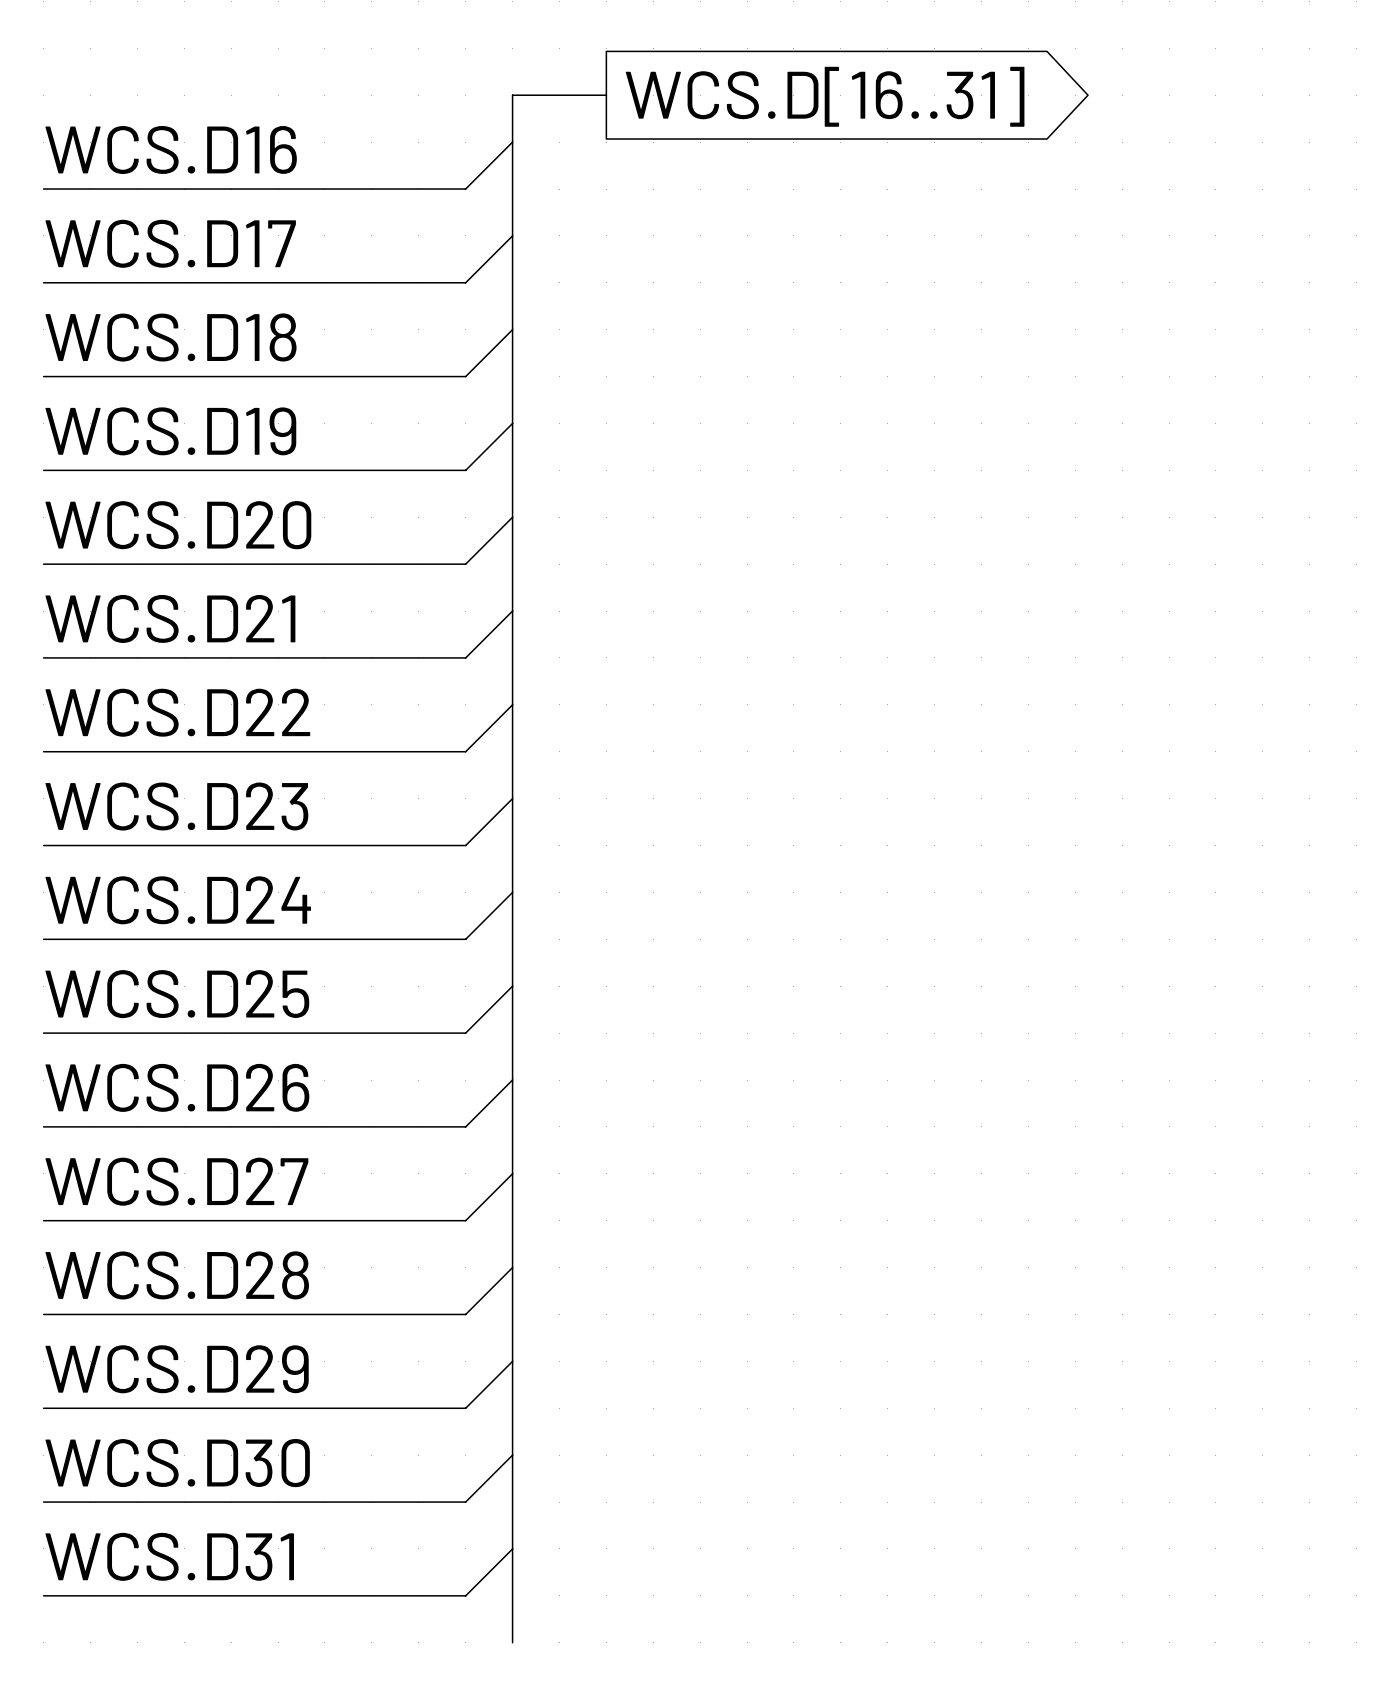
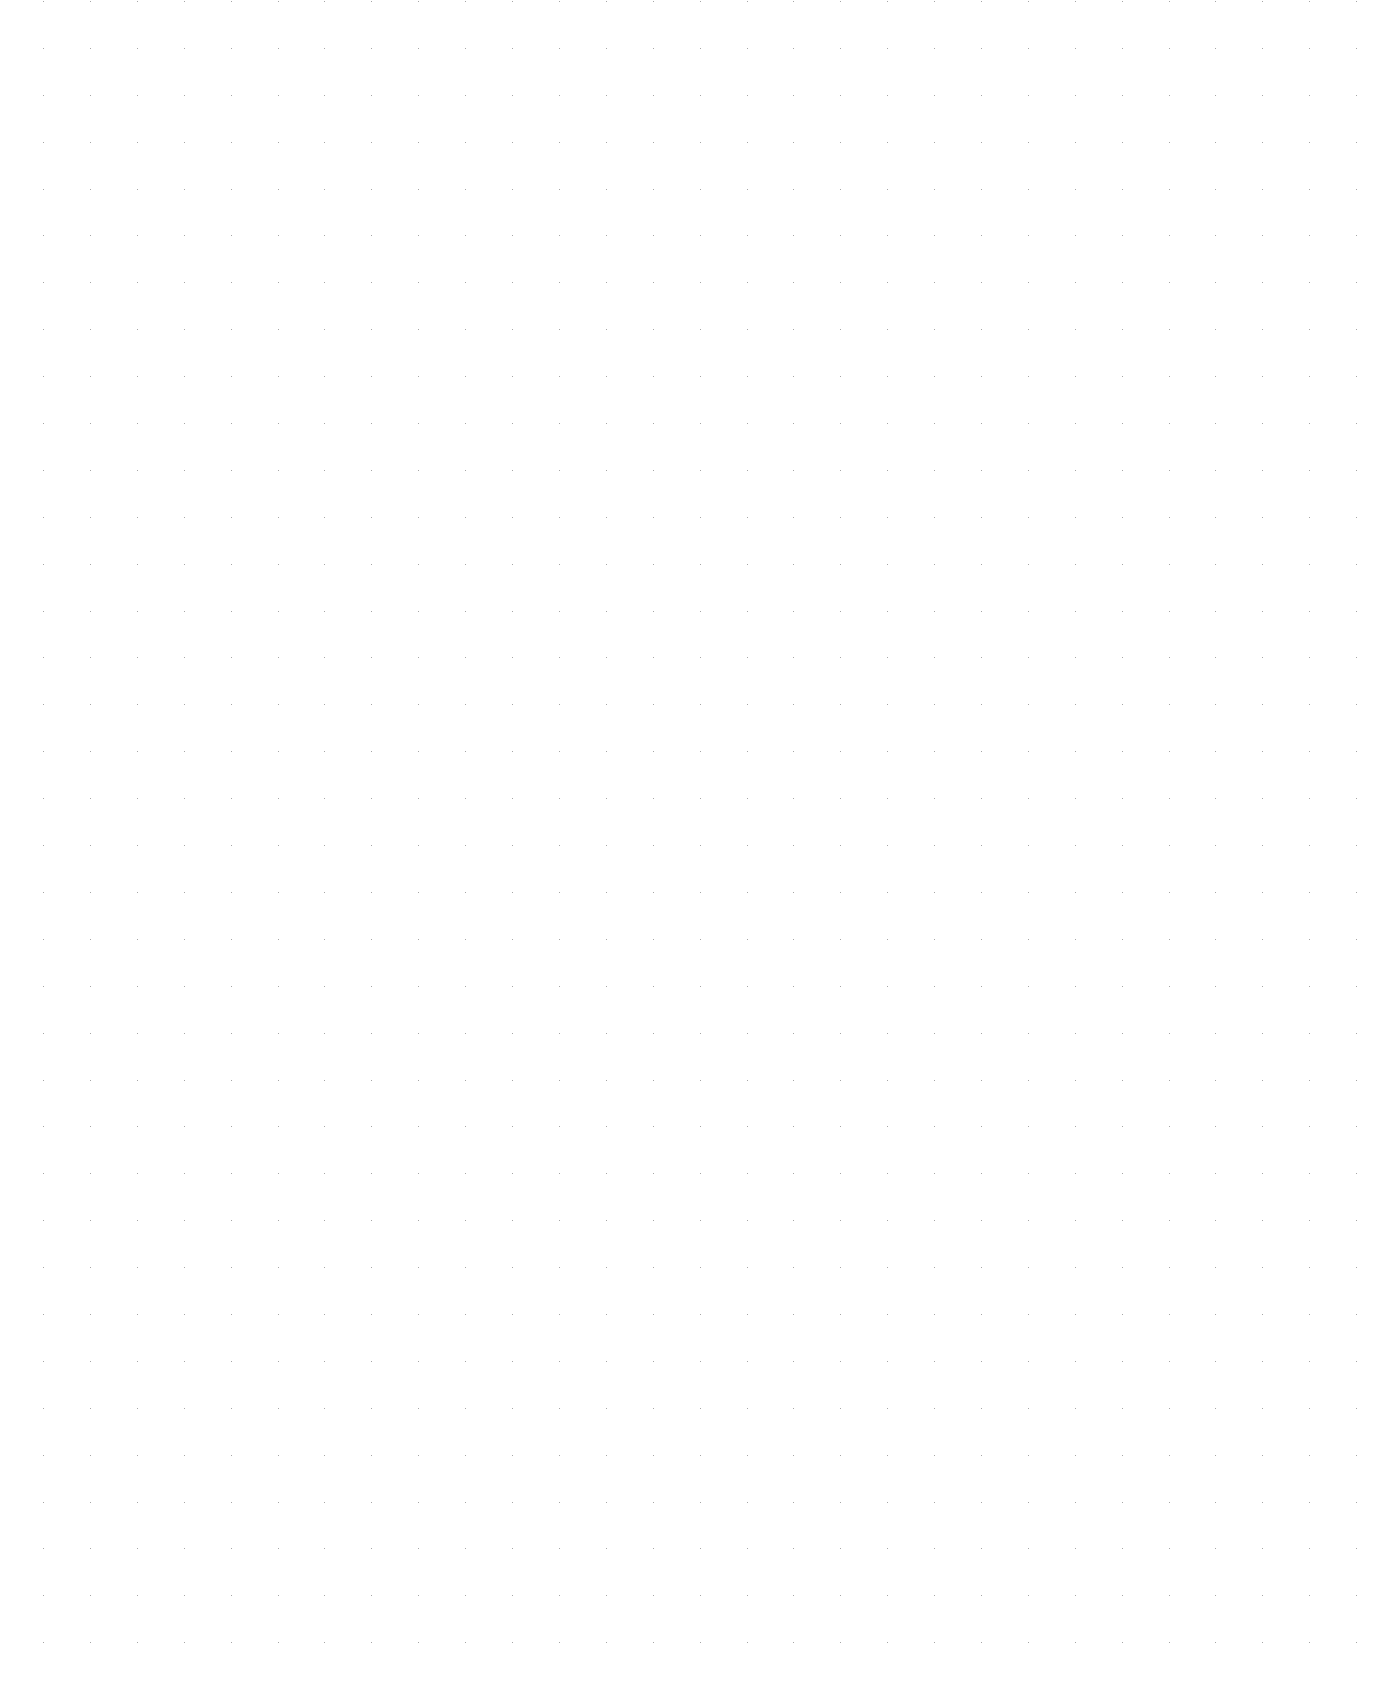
bus: (606, 95) (512, 95) (512, 1642) -> none
global label: WCS.D[16..31] (825, 96) -> none
wire: (512, 142) (465, 189) (43, 189) -> none
label: WCS.D16 (171, 150) -> none
wire: (512, 235) (465, 282) (43, 282) -> none
label: WCS.D17 (170, 243) -> none
wire: (512, 329) (465, 376) (43, 376) -> none
label: WCS.D18 (170, 337) -> none
wire: (512, 423) (465, 470) (43, 470) -> none
label: WCS.D19 (170, 431) -> none
wire: (512, 517) (465, 564) (43, 564) -> none
label: WCS.D20 (178, 525) -> none
wire: (512, 611) (465, 657) (43, 657) -> none
label: WCS.D21 (170, 618) -> none
wire: (512, 704) (465, 751) (43, 751) -> none
label: WCS.D22 (177, 712) -> none
wire: (512, 798) (465, 845) (43, 845) -> none
label: WCS.D23 (176, 806) -> none
wire: (512, 892) (465, 939) (43, 939) -> none
label: WCS.D24 (178, 900) -> none
wire: (512, 986) (465, 1033) (43, 1033) -> none
label: WCS.D25 (177, 994) -> none
wire: (512, 1080) (465, 1126) (43, 1126) -> none
label: WCS.D26 (177, 1087) -> none
wire: (512, 1173) (465, 1220) (43, 1220) -> none
label: WCS.D27 (176, 1181) -> none
wire: (512, 1267) (465, 1314) (43, 1314) -> none
label: WCS.D28 (177, 1275) -> none
wire: (512, 1361) (465, 1408) (43, 1408) -> none
label: WCS.D29 (177, 1369) -> none
wire: (512, 1455) (465, 1502) (43, 1502) -> none
label: WCS.D30 (177, 1463) -> none
wire: (512, 1548) (465, 1595) (43, 1595) -> none
label: WCS.D31 (169, 1556) -> none

